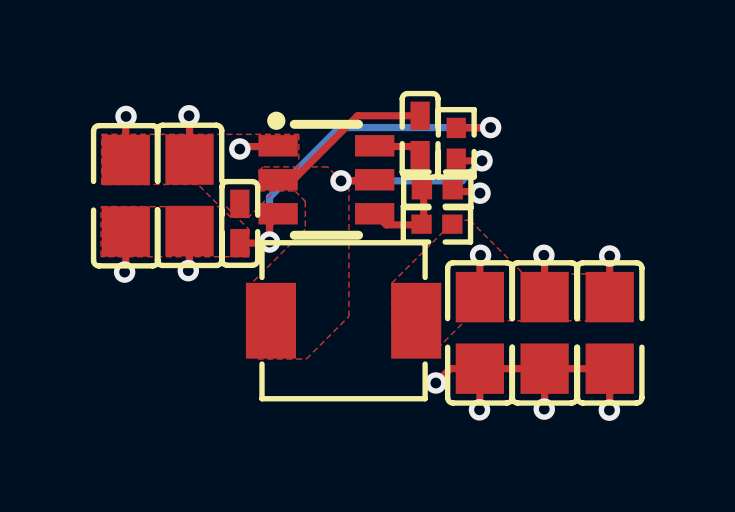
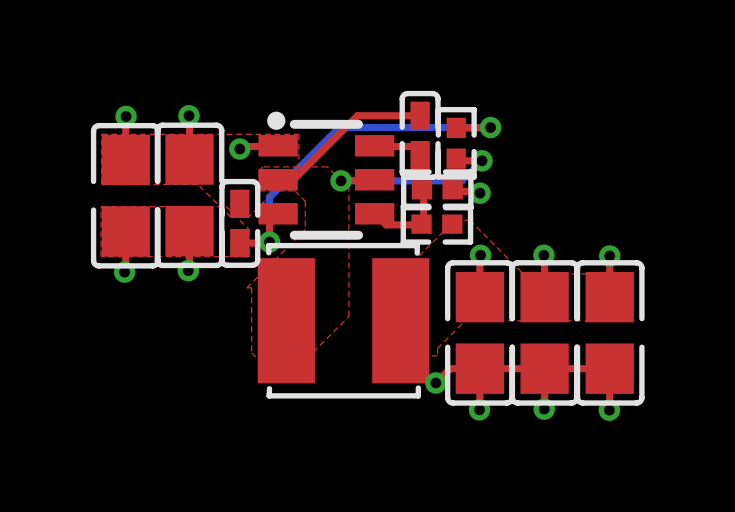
part footprint: [245, 240, 442, 402] -> [257, 242, 430, 399]

